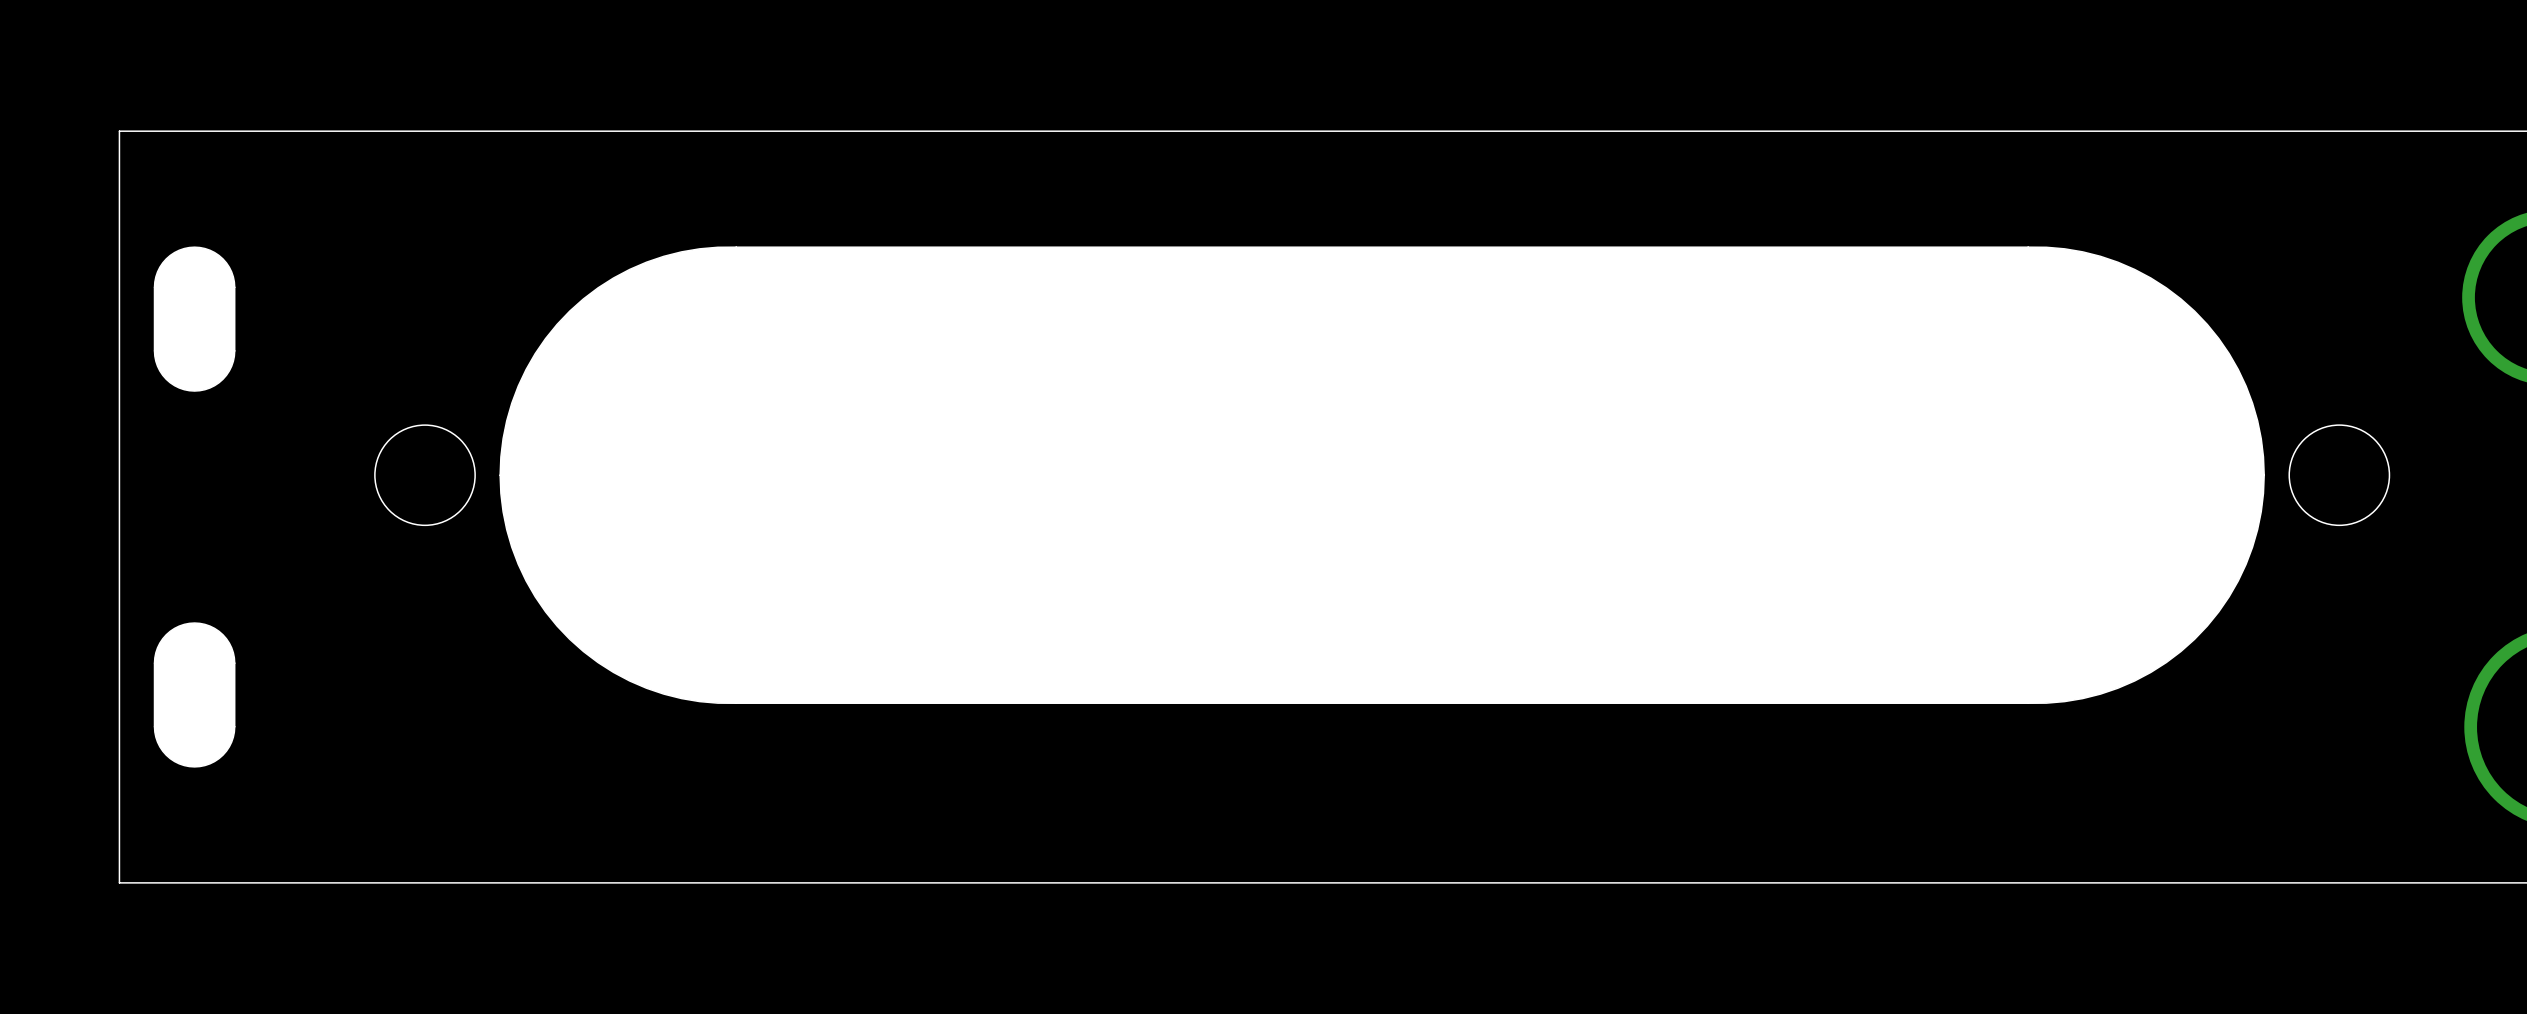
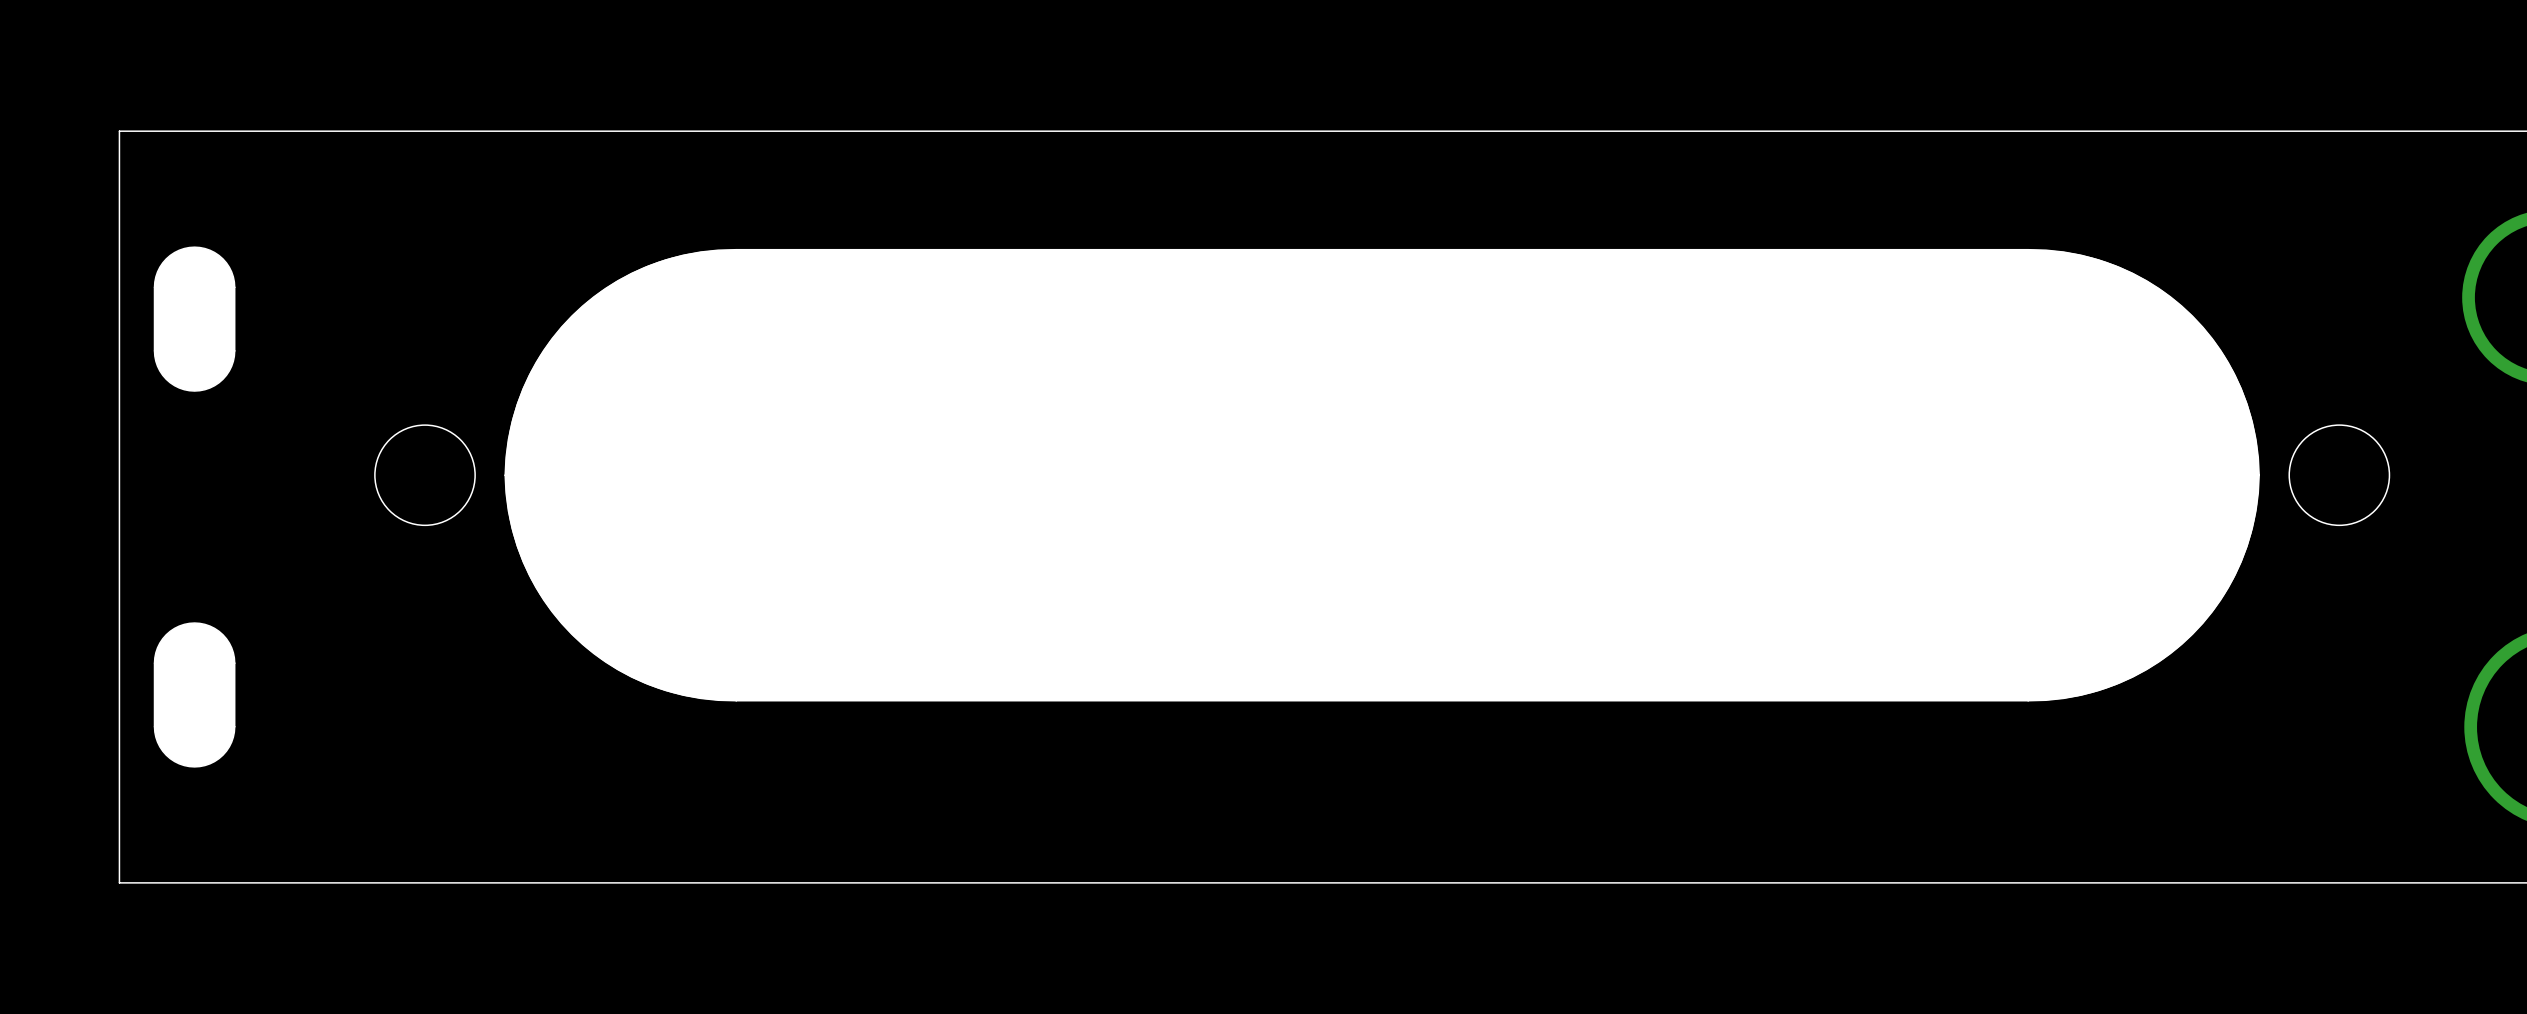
part footprint: [374, 246, 2390, 704] -> [374, 249, 2390, 702]

